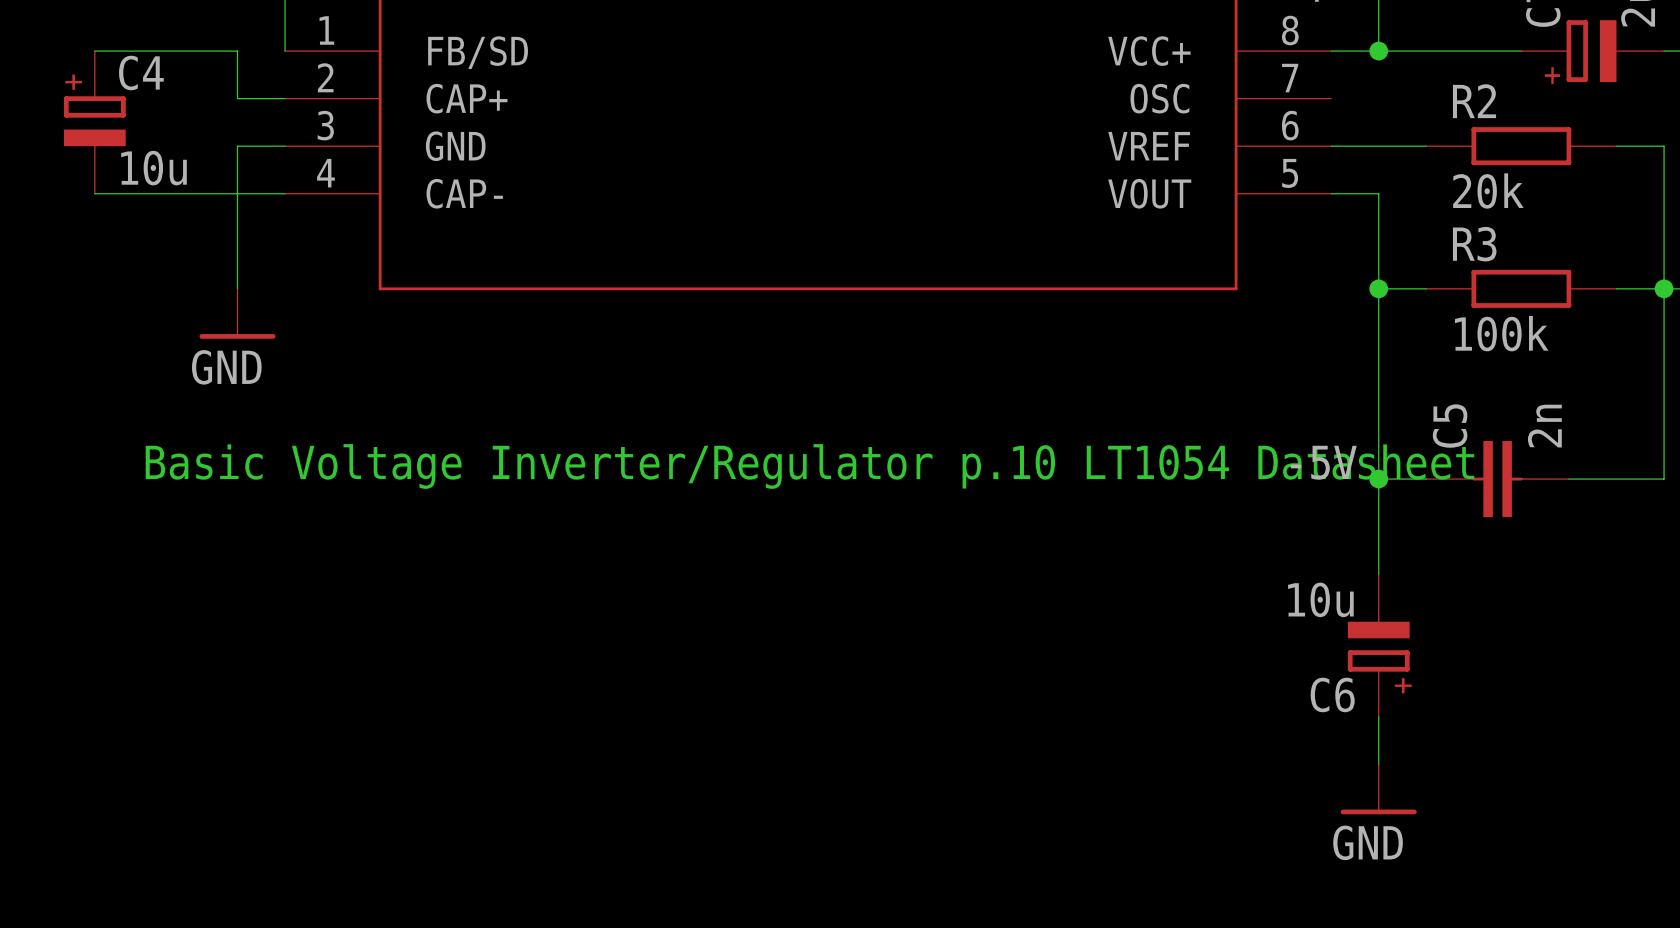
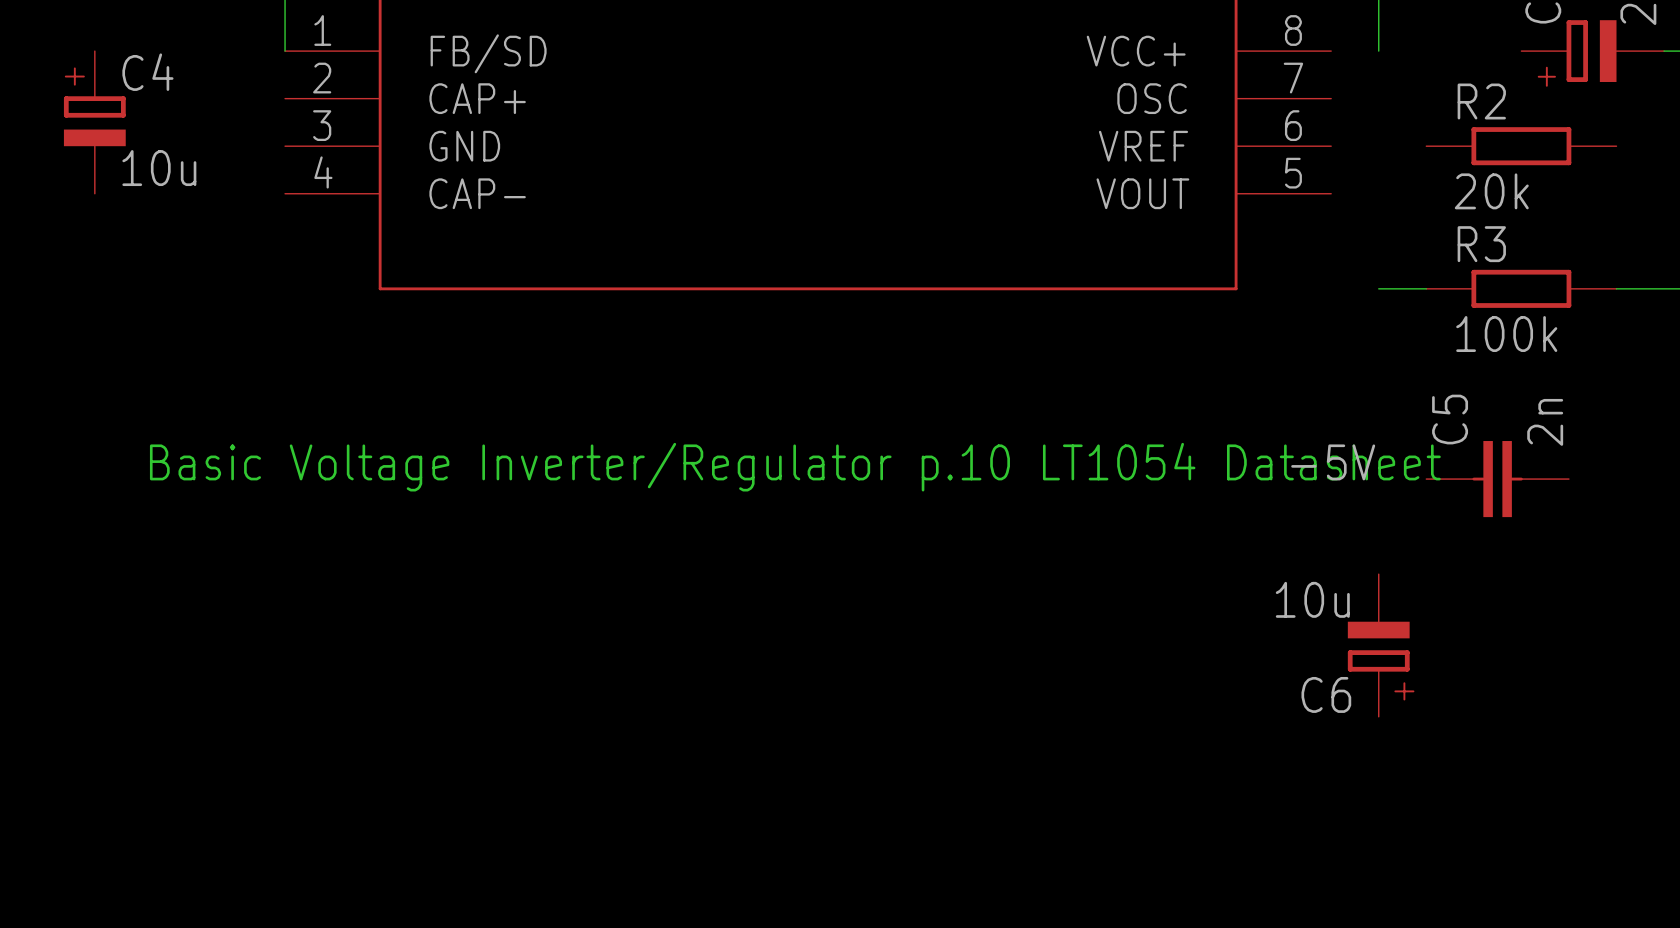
wire: (94, 51) (237, 51) (237, 98) (285, 98) -> none
wire: (1331, 51) (1521, 51) -> none
junction: (1378, 51) -> none
wire: (285, 146) (237, 146) (237, 288) -> none
wire: (1331, 146) (1426, 146) -> none
wire: (1616, 146) (1664, 146) (1664, 479) (1568, 479) -> none
wire: (94, 193) (285, 193) -> none
wire: (1331, 193) (1378, 193) (1378, 574) -> none
junction: (1378, 288) -> none
junction: (1664, 288) -> none
power symbol: GND (237, 313) -> none
wire: (1378, 479) (1426, 479) -> none
junction: (1378, 479) -> none
wire: (1378, 716) (1378, 764) -> none
power symbol: GND (1378, 789) -> none

